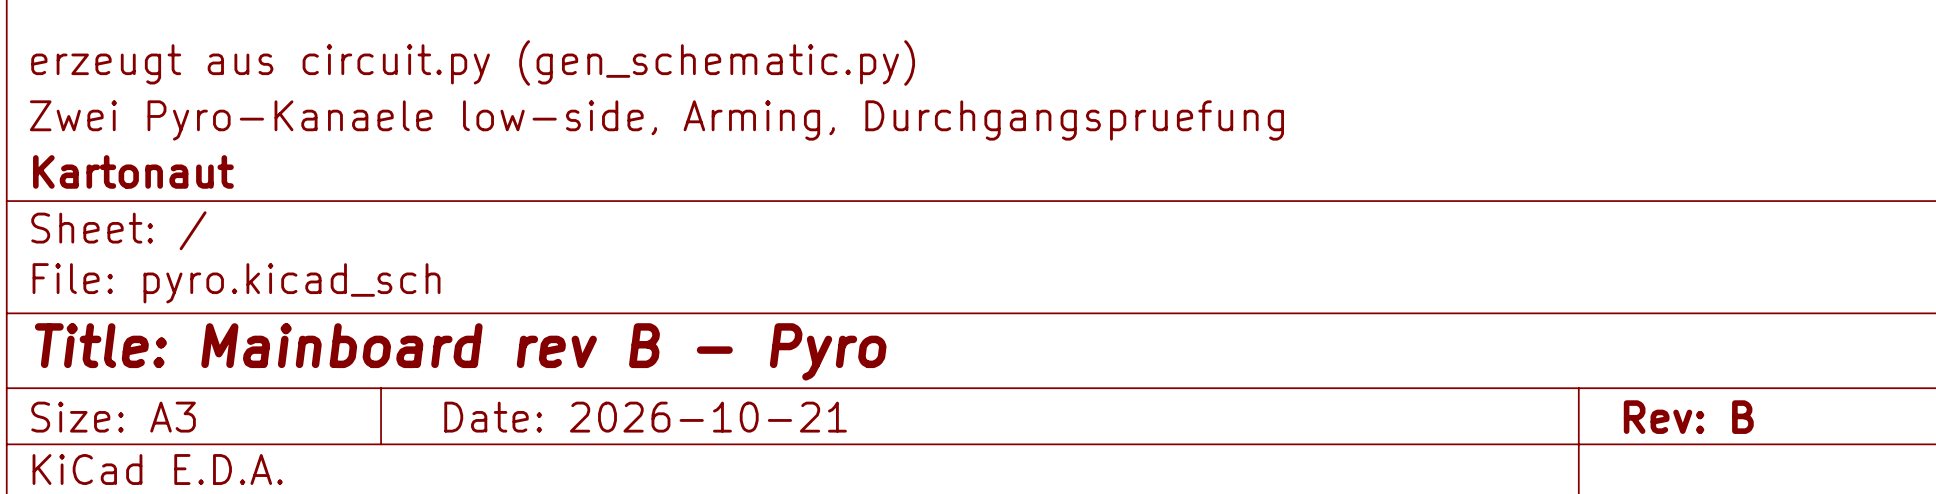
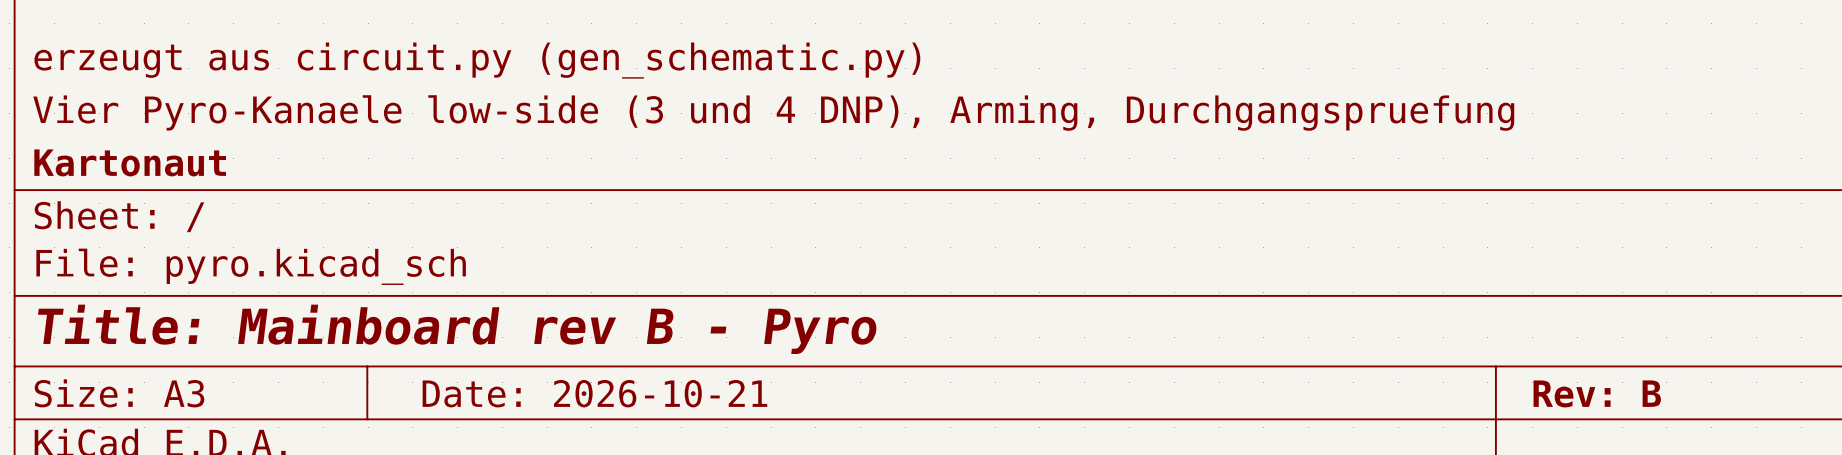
title block: Zwei Pyro-Kanaele low-side, Arming, Durchgangspruefung (656, 120) -> Vier Pyro-Kanaele low-side (3 und 4 DNP), Arming, Durchgangspruefung (773, 113)

